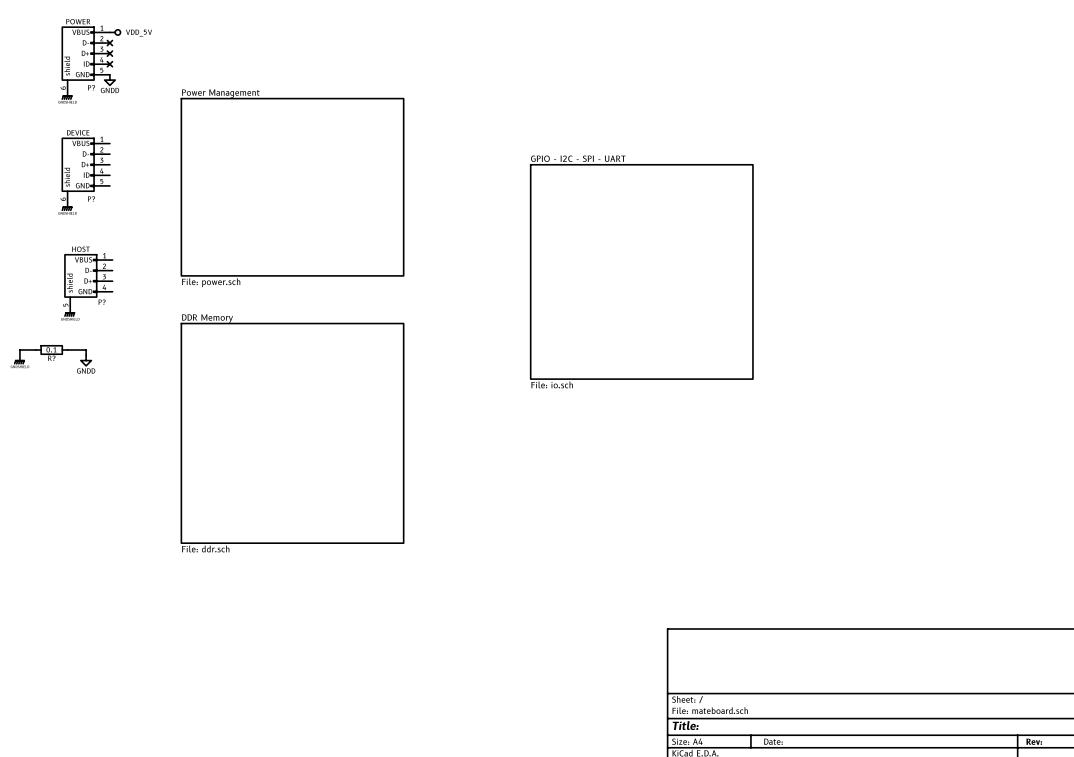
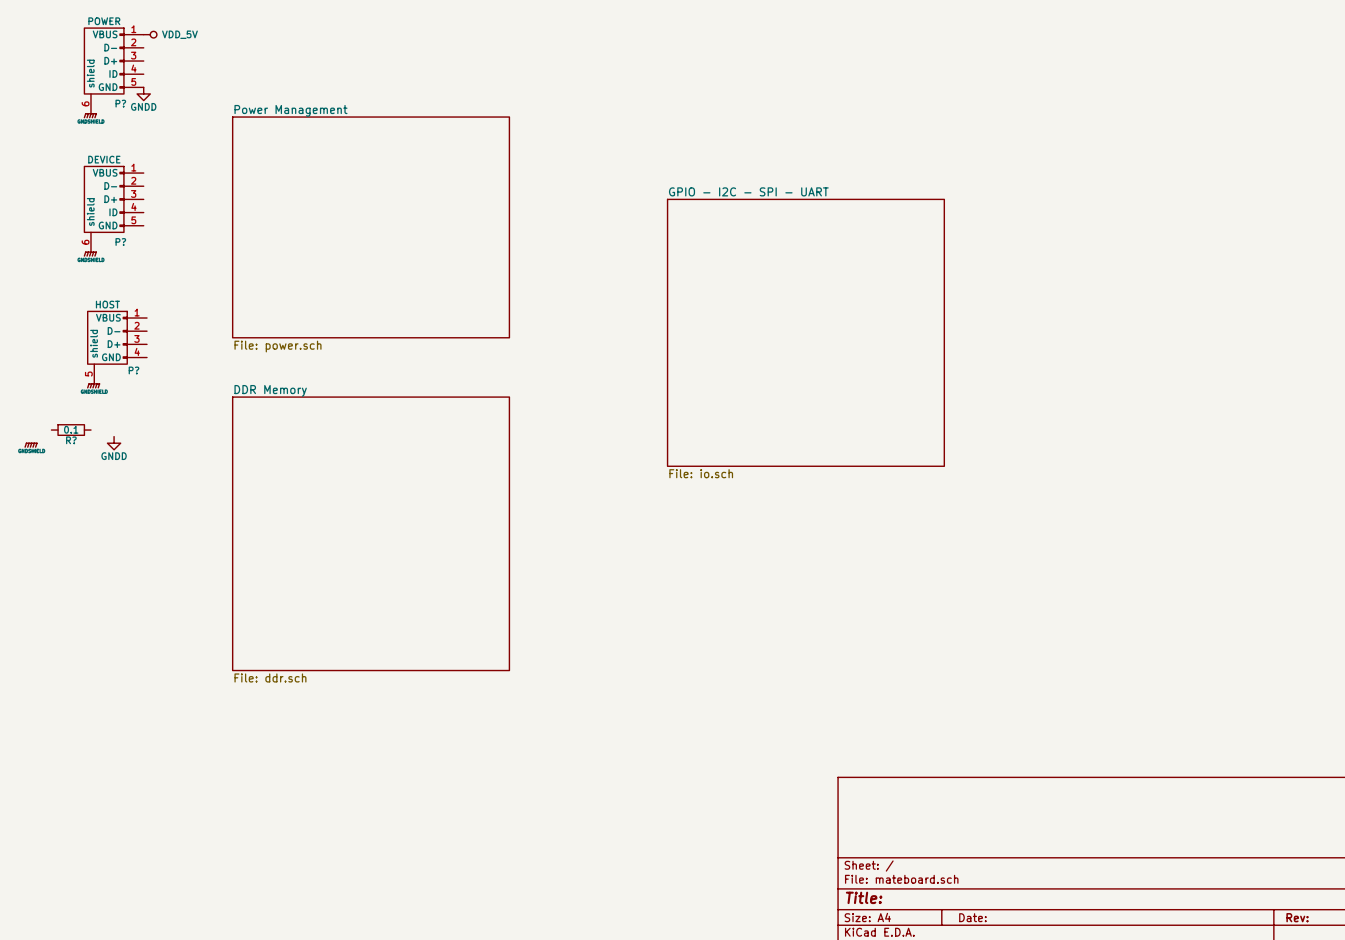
no-connect mark: (109, 43) -> none
no-connect mark: (109, 53) -> none
no-connect mark: (109, 64) -> none
wire: (35, 350) (19, 350) (19, 360) -> none
wire: (67, 350) (86, 350) (86, 355) -> none

